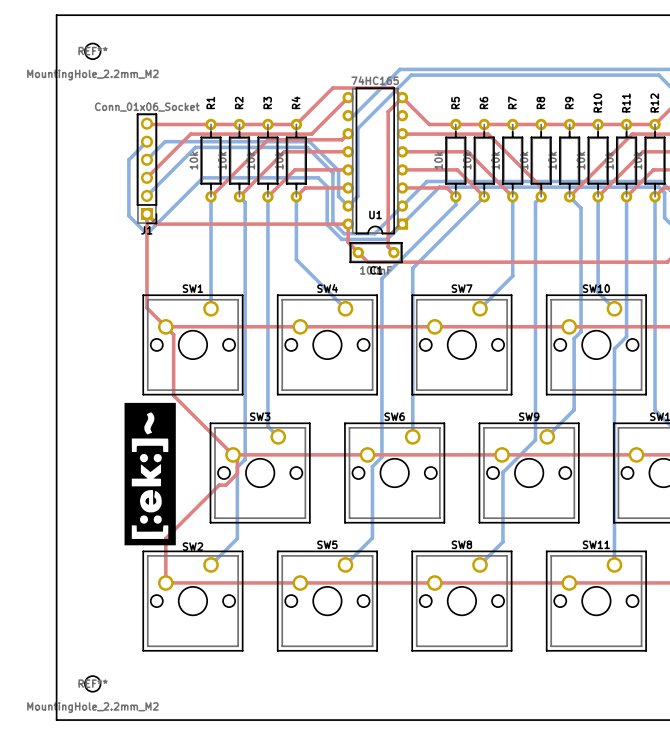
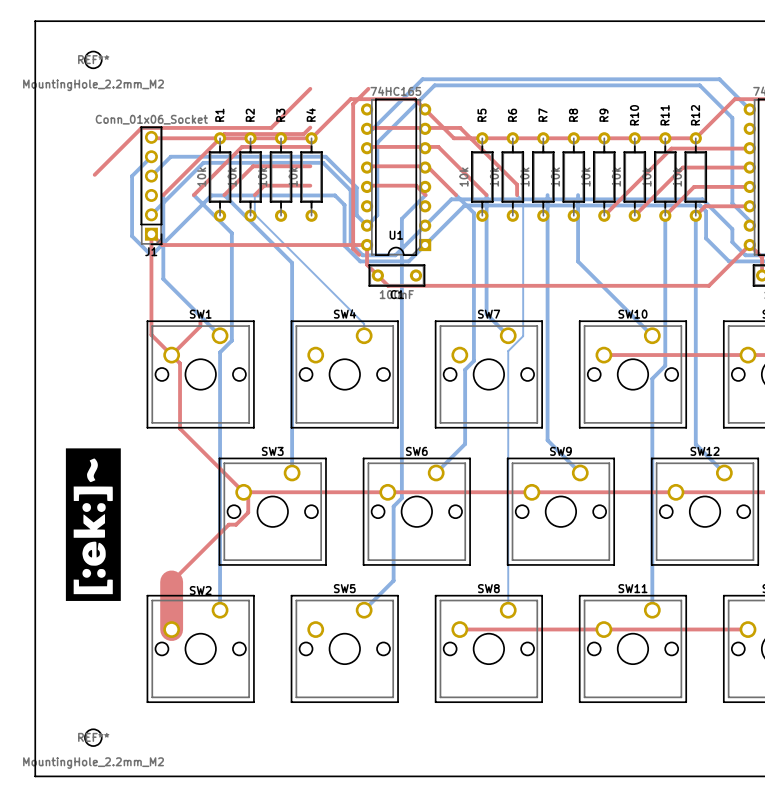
board edge: (56, 15) (56, 720) -> (54, 21) (35, 21) (35, 776) (54, 776)
top track: (348, 97) (311, 134) (190, 134) (146, 177) -> (310, 88) (271, 127) (141, 127) (94, 174)
top track: (402, 97) (388, 111) (388, 246) (393, 252) -> (368, 88) (353, 104) (353, 248) (359, 254)
top track: (348, 133) (342, 139) (268, 139) (211, 196) -> (310, 127) (303, 134) (224, 134) (163, 195)
top track: (402, 133) (488, 134) (541, 187) (541, 196) -> (368, 127) (460, 127) (517, 184) (517, 195)
top track: (348, 151) (284, 151) (239, 196) -> (310, 146) (242, 146) (193, 195)
top track: (402, 151) (467, 151) (512, 196) -> (368, 146) (438, 146) (486, 195)
top track: (348, 169) (294, 169) (267, 196) -> (310, 166) (253, 166) (224, 195)
top track: (402, 169) (457, 169) (484, 196) -> (368, 166) (427, 166) (456, 195)
top track: (348, 187) (305, 187) (296, 196) -> (310, 185) (264, 185) (254, 195)
top track: (402, 187) (446, 187) (455, 196) -> (368, 185) (416, 185) (425, 195)
bottom track: (211, 196) (211, 308) -> (163, 195) (163, 279) (220, 335)
bottom track: (239, 196) (245, 202) (245, 459) (237, 467) (237, 538) (211, 564) -> (193, 195) (231, 233) (231, 340) (220, 352) (220, 610)
bottom track: (267, 196) (267, 426) (278, 436) -> (224, 195) (292, 262) (292, 472)
bottom track: (296, 196) (296, 259) (345, 308) -> (254, 195) (254, 214) (364, 323) (364, 335)
bottom track: (455, 196) (455, 204) (381, 278) (381, 457) (372, 466) (372, 538) -> (425, 195) (401, 218) (401, 498) (393, 506) (392, 581)
bottom track: (484, 196) (412, 268) (412, 436) -> (456, 195) (473, 212) (473, 360) (465, 369) (465, 444) (436, 472)
bottom track: (512, 196) (512, 276) (479, 308) -> (486, 195) (486, 314) (508, 335)
bottom track: (541, 196) (535, 202) (535, 439) (502, 472) (502, 541) (479, 564) -> (517, 195) (523, 201) (523, 336) (508, 351) (508, 610)
bottom track: (569, 196) (581, 208) (581, 331) (574, 338) (574, 409) (547, 436) -> (547, 195) (547, 440) (580, 472)
bottom track: (598, 196) (598, 292) -> (578, 195) (578, 261) (634, 318)
top track: (165, 326) (300, 326) -> (171, 355) (200, 326) (200, 321)
top track: (300, 326) (434, 326) -> none
top track: (434, 326) (569, 326) -> none
drawing position: (150, 474) -> (93, 524)
top track width: thin (165, 538) (165, 583) -> thick (171, 581) (171, 629)
top track: (165, 582) (300, 582) -> none
top track: (300, 582) (434, 582) -> none

